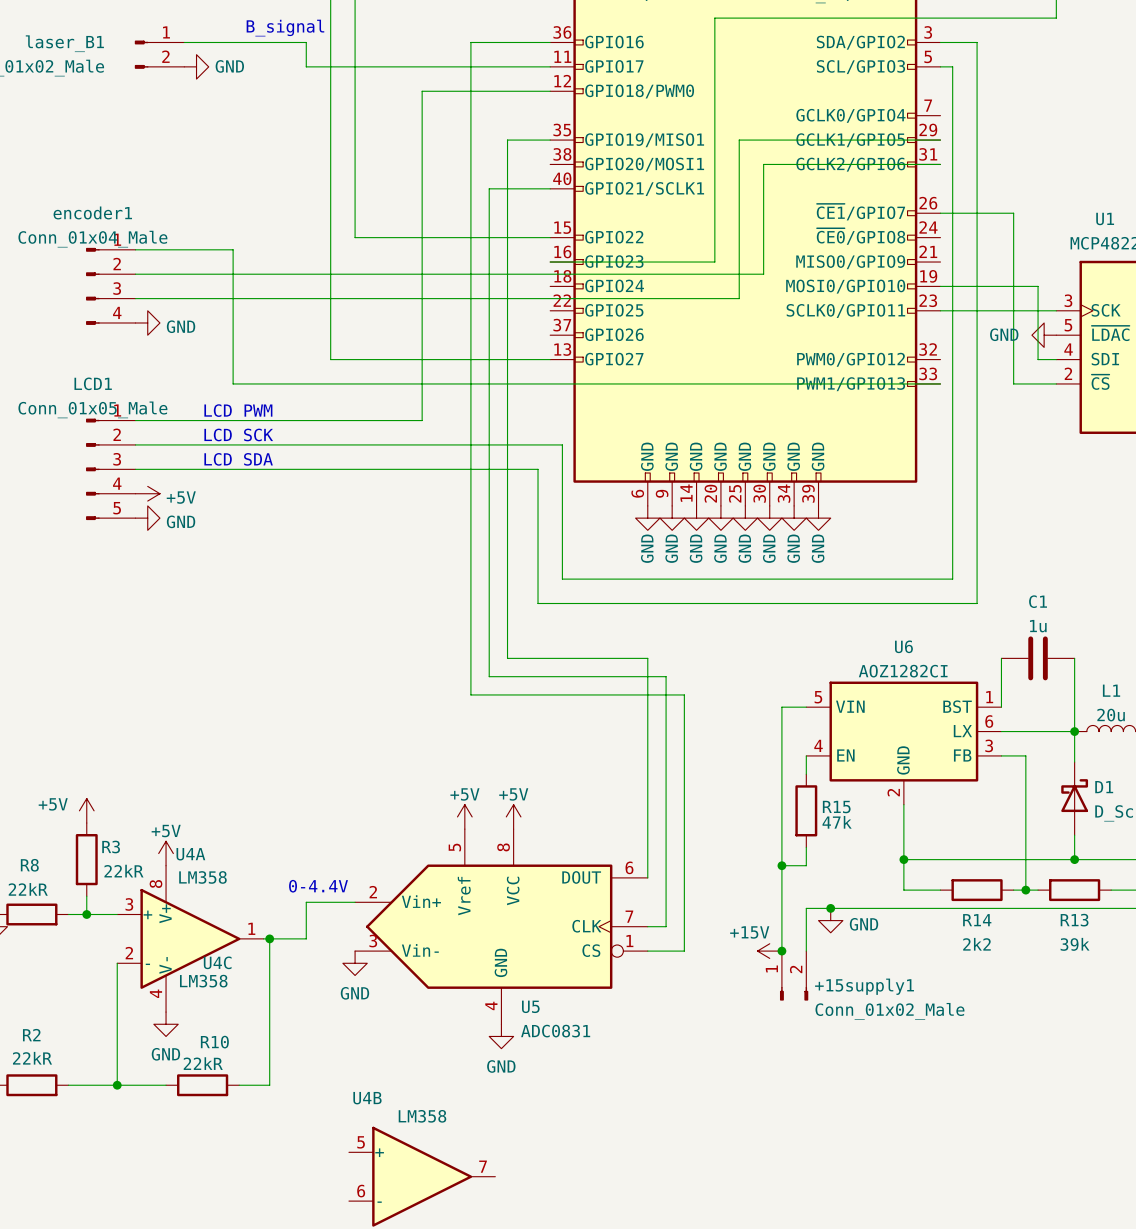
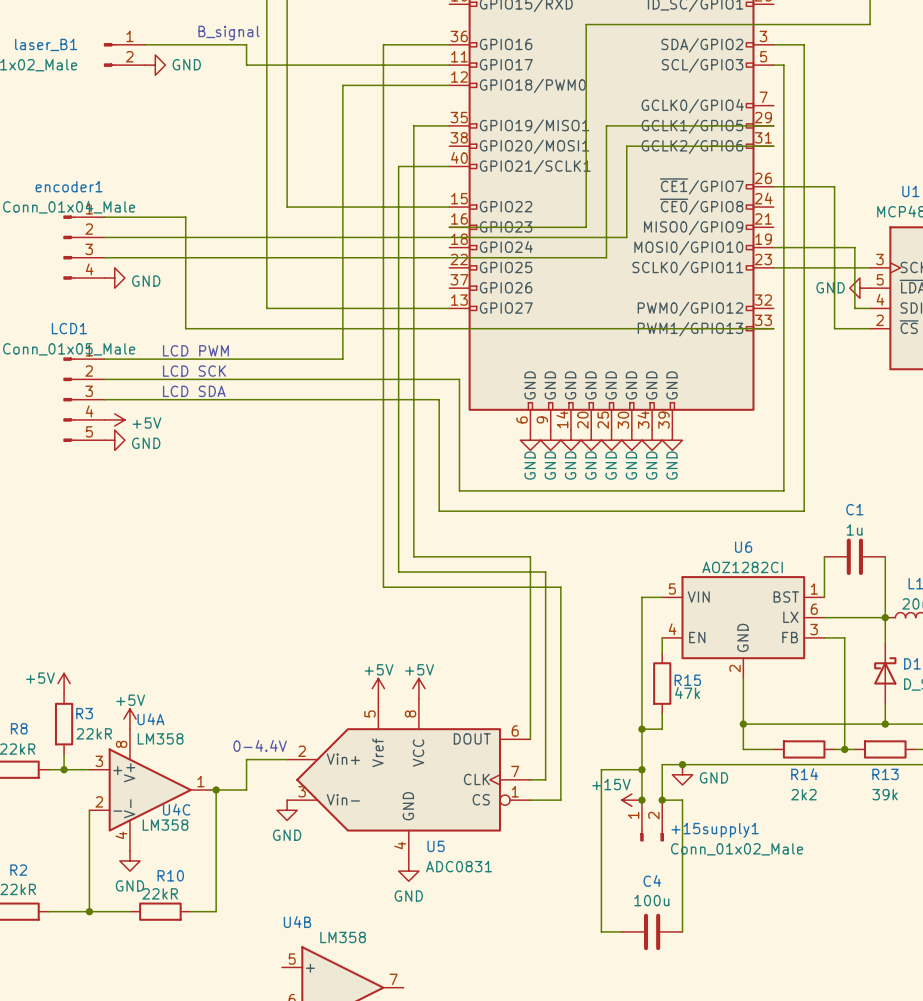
wire: none -> (641, 769) (601, 769) (601, 931) (621, 931)
junction: none -> (641, 769)
wire: none -> (662, 800) (682, 800) (682, 931)
junction: none -> (662, 800)
C4: none -> 100u (652, 931)

